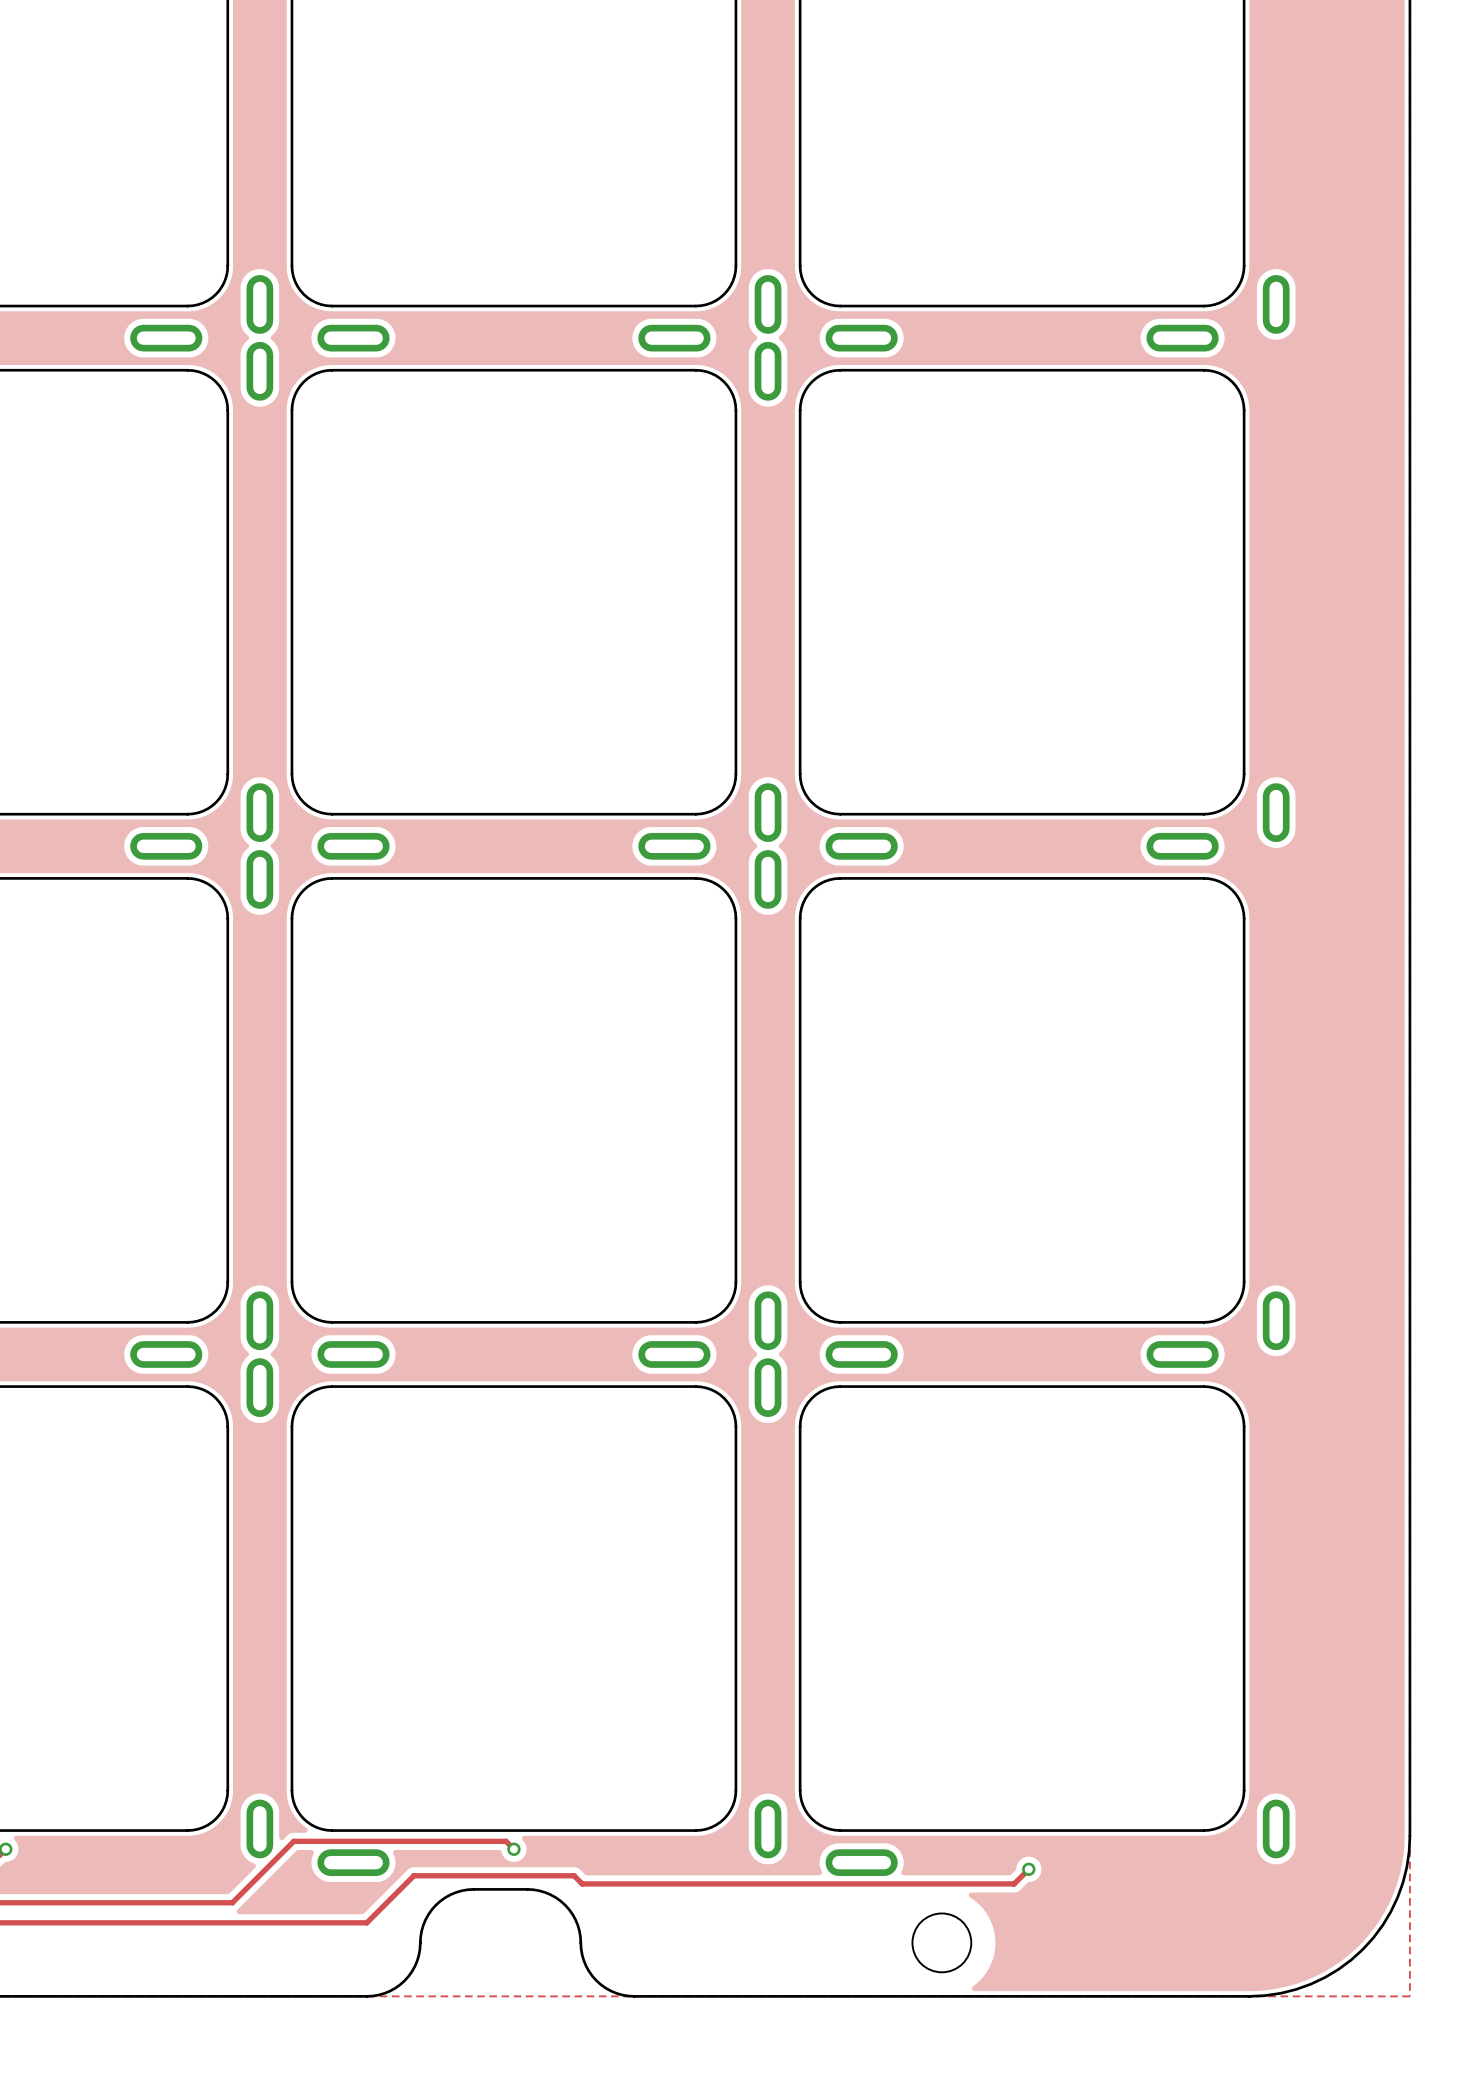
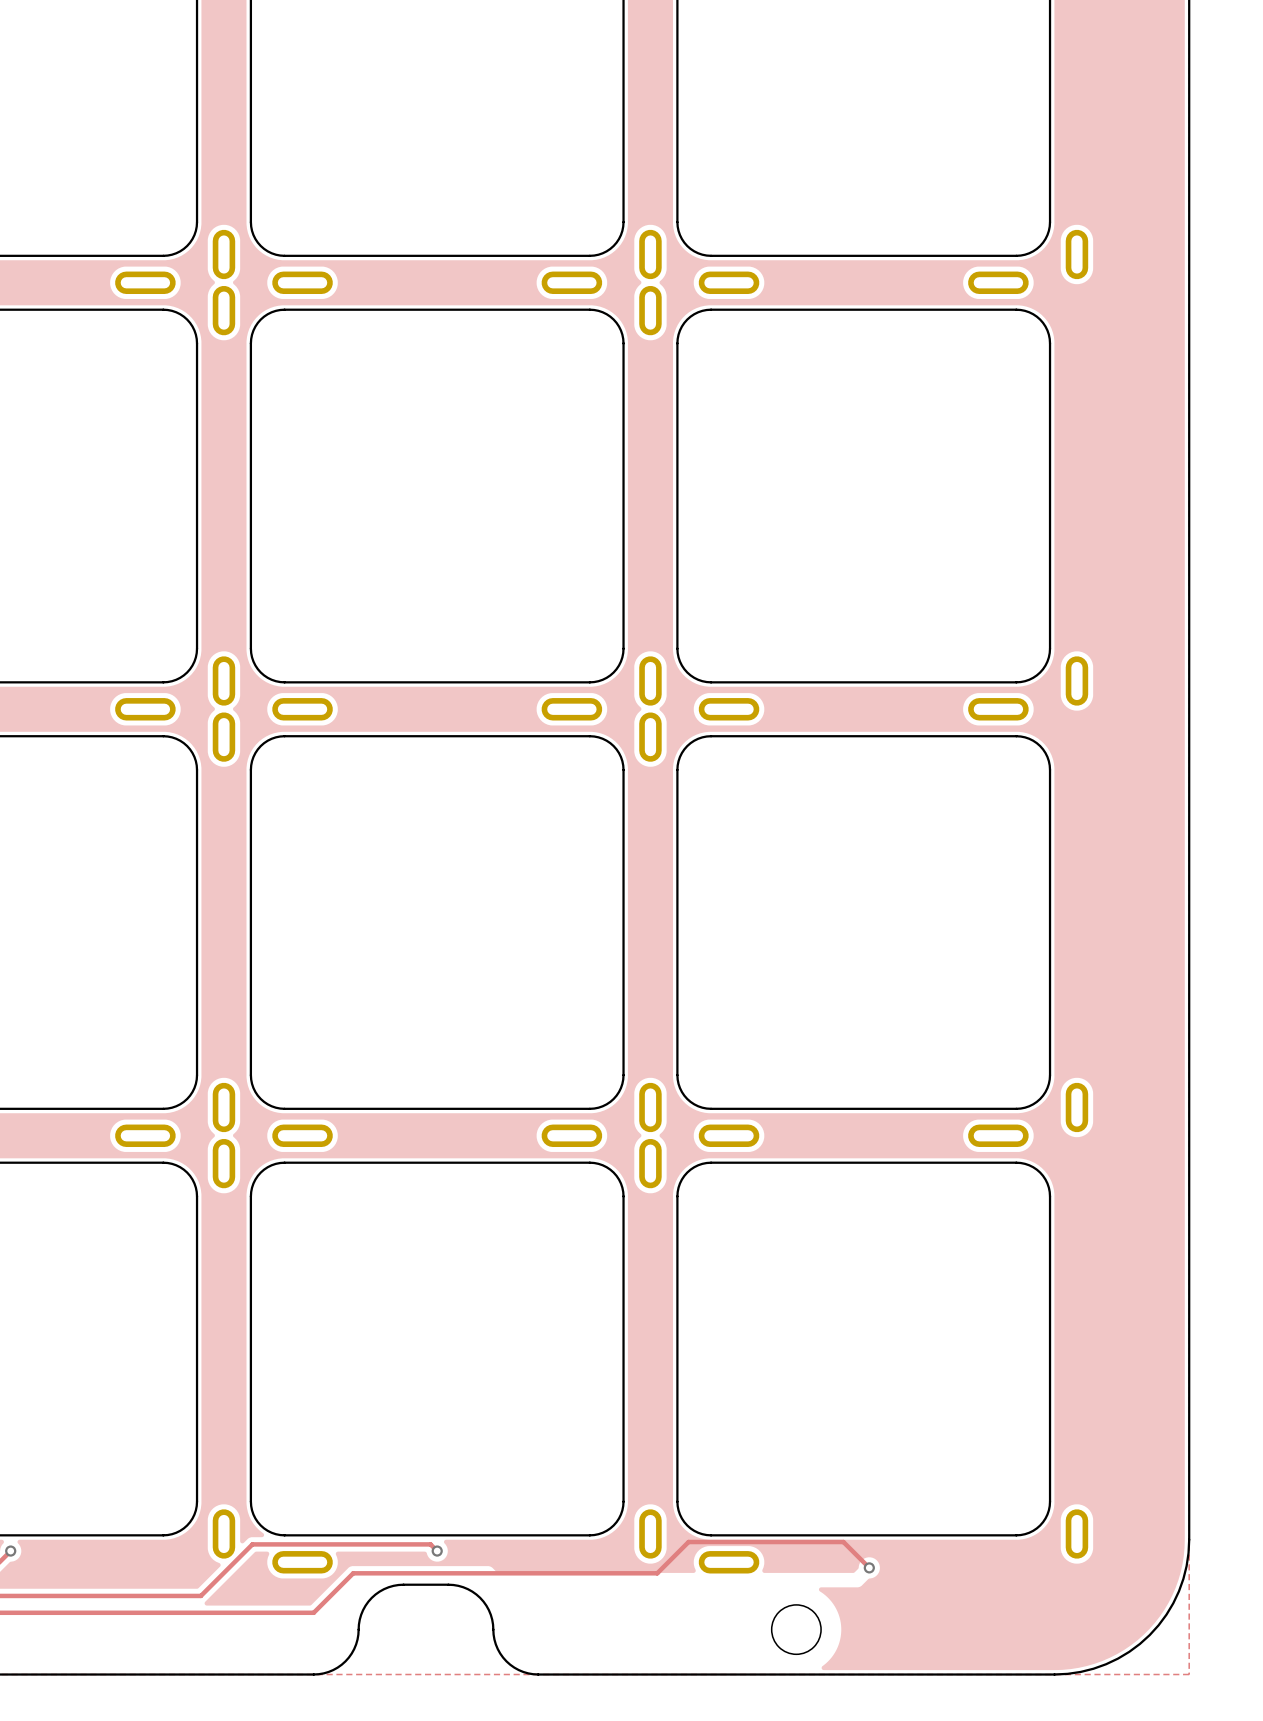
track: (1028, 1869) (1014, 1883) (582, 1883) (574, 1875) -> (869, 1567) (843, 1542) (688, 1542) (657, 1573) (487, 1573)

